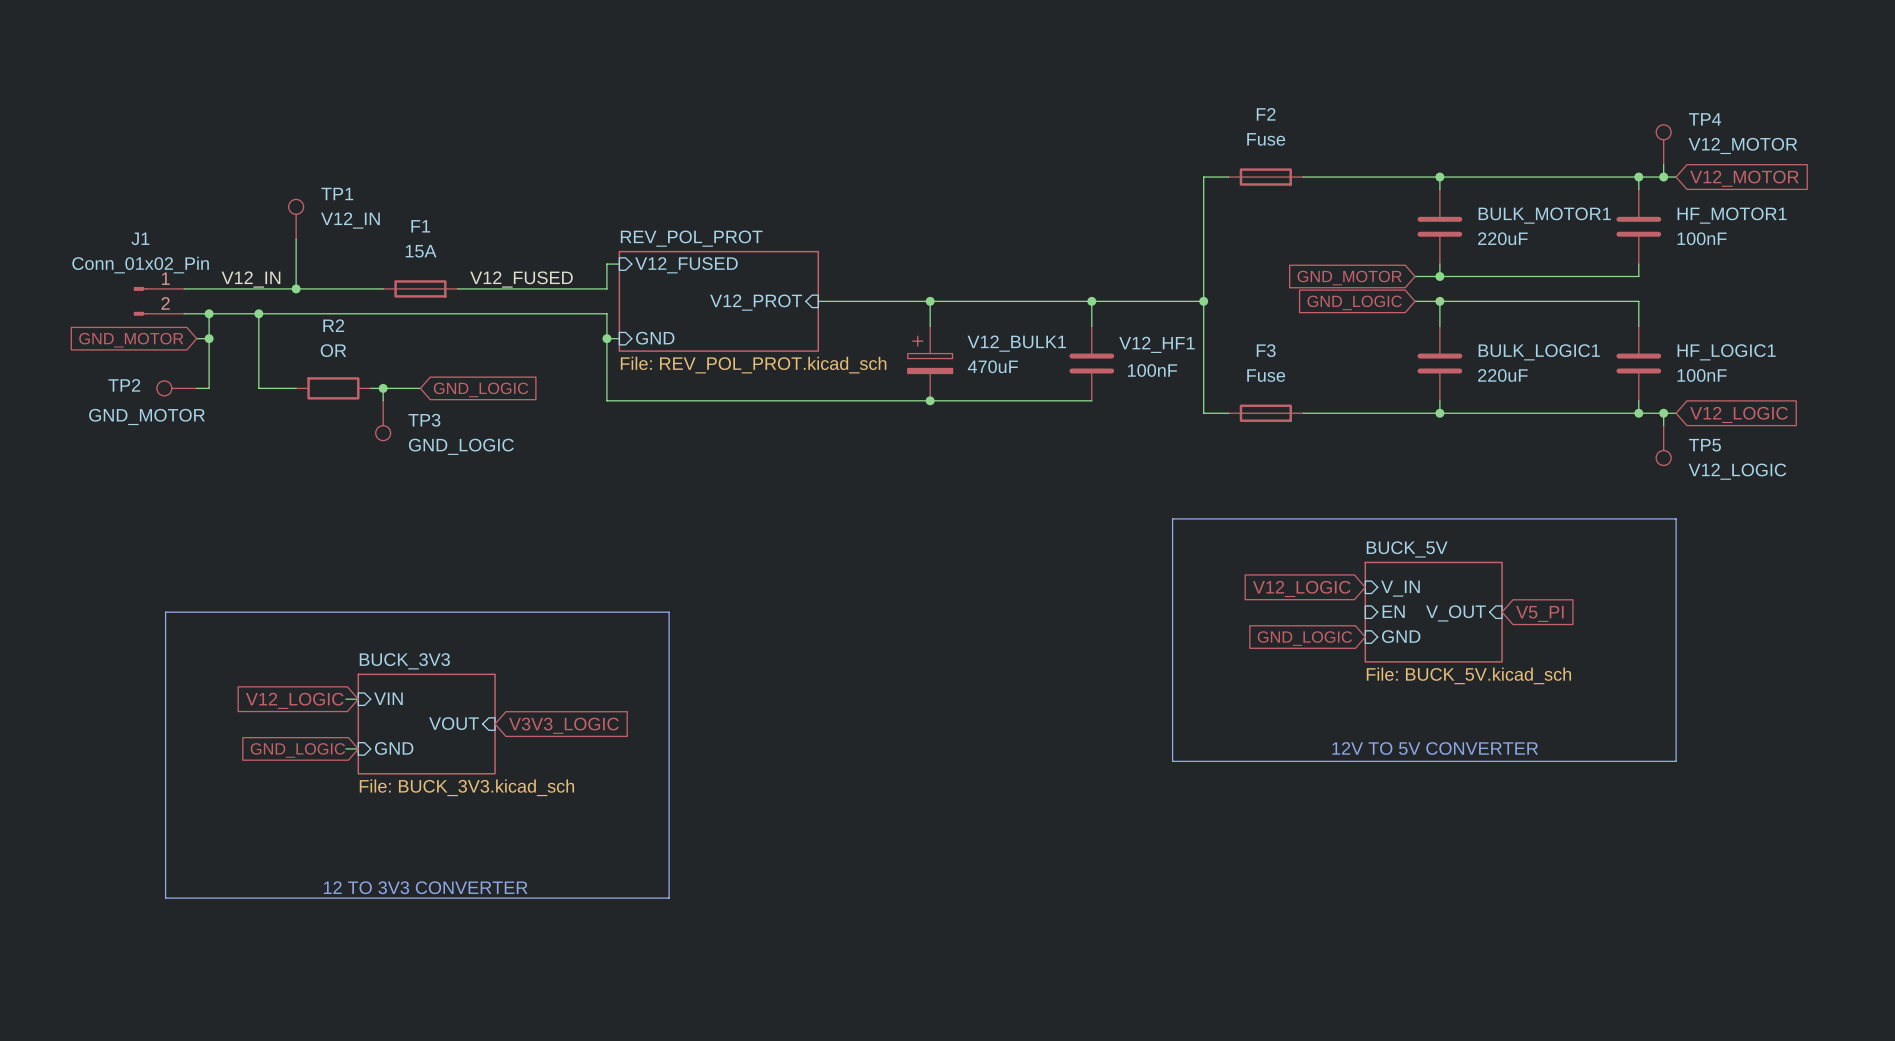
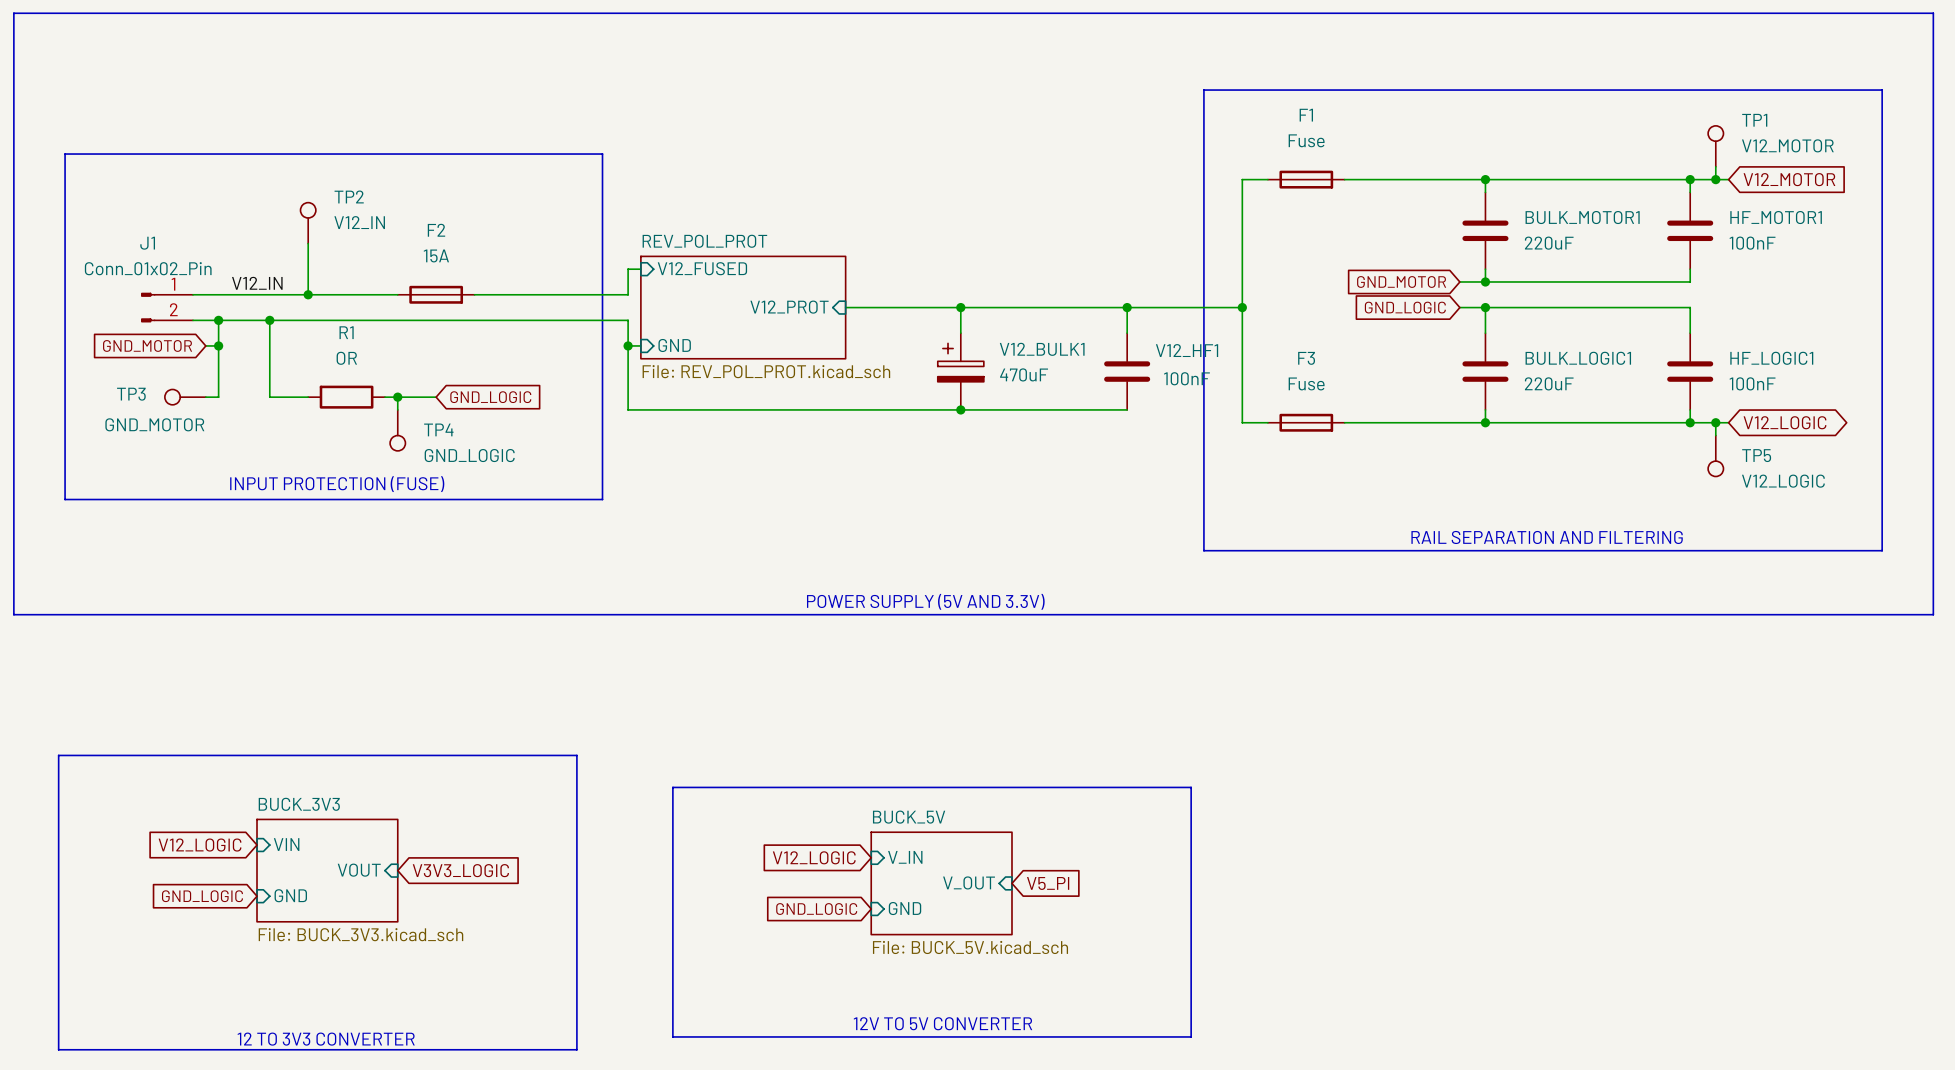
line: none -> (13, 13) (1933, 13) (1933, 614) (13, 614) (13, 13)
line: none -> (1203, 90) (1882, 90) (1882, 550) (1203, 550) (1203, 90)
F2 name: F2 (1266, 114) -> F1 (1306, 115)
TP4 name: TP4 (1705, 119) -> TP1 (1754, 120)
line: none -> (65, 154) (602, 154) (602, 499) (65, 499) (65, 154)
TP1 name: TP1 (337, 193) -> TP2 (349, 196)
F1 name: F1 (420, 226) -> F2 (436, 230)
label: V12_FUSED (521, 279) -> none
R2 name: R2 (333, 325) -> R1 (346, 332)
TP2 name: TP2 (124, 385) -> TP3 (131, 394)
global label shape: input (1739, 414) -> bidirectional (1785, 422)
TP3 name: TP3 (424, 420) -> TP4 (438, 429)
text: none -> INPUT PROTECTION (FUSE) (337, 484)
line: (1172, 518) (1676, 518) (1676, 761) (1172, 761) (1172, 518) -> none
text: none -> RAIL SEPARATION AND FILTERING (1547, 537)
text: none -> POWER SUPPLY (5V AND 3.3V) (925, 601)
sheet pin: V_IN (1400, 588) -> none
global label: V12_LOGIC (1301, 589) -> none
sheet pin: EN (1393, 611) -> none
line: (165, 612) (669, 612) (669, 898) (165, 898) (165, 612) -> (58, 755) (576, 755) (576, 1049) (58, 1049) (58, 755)
sheet BUCK_5V position: (1433, 612) -> (941, 883)
sheet pin: V_OUT (1455, 613) -> none
global label: V5_PI (1539, 613) -> none
sheet pin: GND (1401, 636) -> none
global label: GND_LOGIC (1304, 638) -> none
sheet pin position: VIN (388, 698) -> VIN (286, 844)
wire: (345, 699) (358, 699) -> none
global label position: V12_LOGIC (294, 700) -> V12_LOGIC (200, 845)
sheet pin position: VOUT (453, 723) -> VOUT (359, 870)
sheet BUCK_3V3 position: (426, 724) -> (327, 870)
global label position: V3V3_LOGIC (563, 725) -> V3V3_LOGIC (460, 870)
wire: (345, 748) (358, 748) -> none
sheet pin position: GND (394, 748) -> GND (290, 895)
text: 12V TO 5V CONVERTER (1435, 748) -> none
global label position: GND_LOGIC (297, 750) -> GND_LOGIC (202, 896)
line: none -> (672, 787) (1191, 787) (1191, 1036) (672, 1036) (672, 787)
global label: none -> V12_LOGIC (814, 857)
sheet pin: none -> V_IN (905, 857)
sheet pin: none -> V_OUT (969, 882)
global label: none -> V5_PI (1048, 883)
sheet pin: none -> GND (905, 908)
text position: 12 TO 3V3 CONVERTER (425, 887) -> 12 TO 3V3 CONVERTER (326, 1039)
global label: none -> GND_LOGIC (816, 909)
text: none -> 12V TO 5V CONVERTER (942, 1023)

